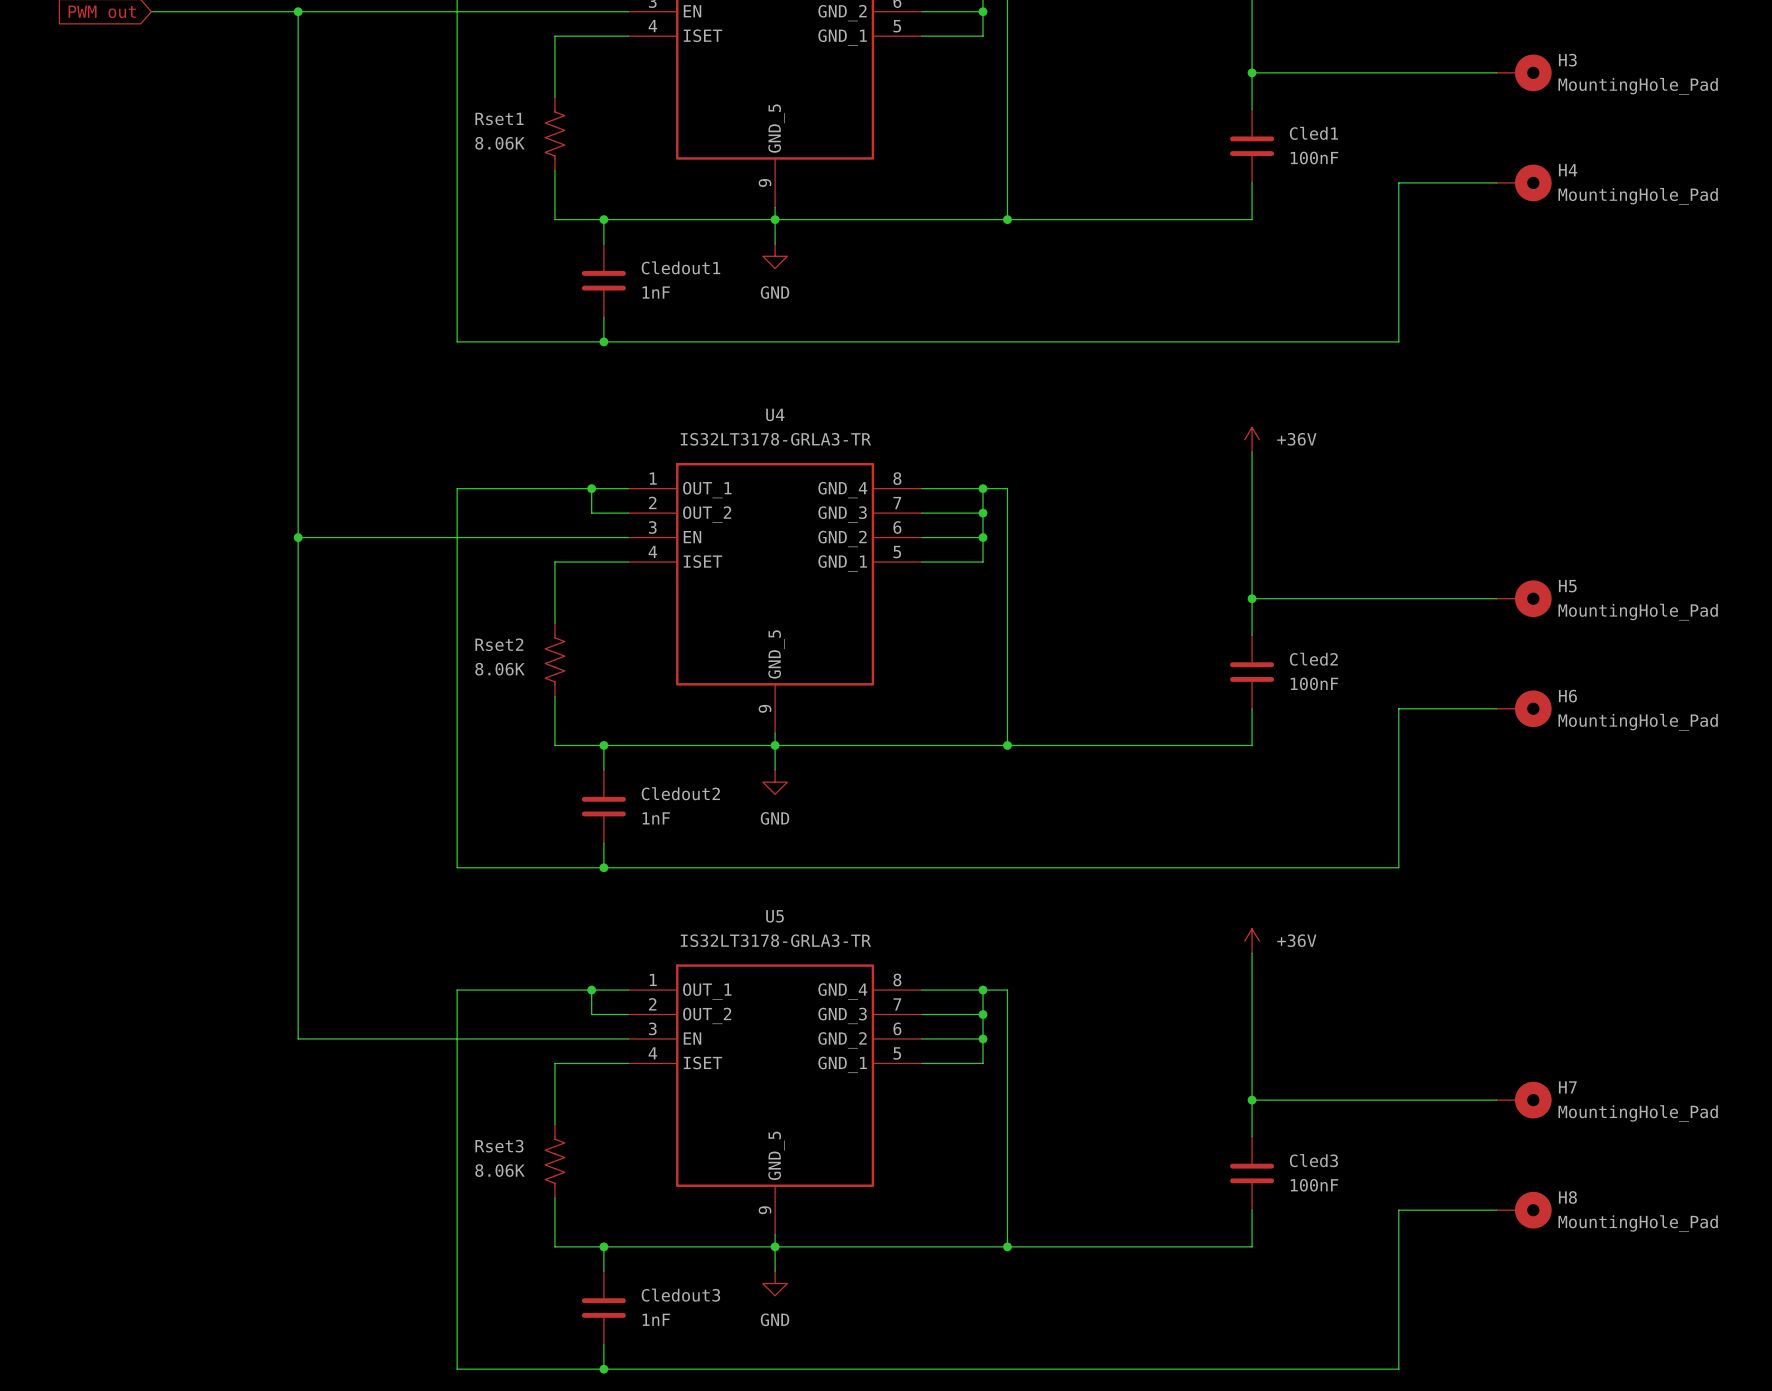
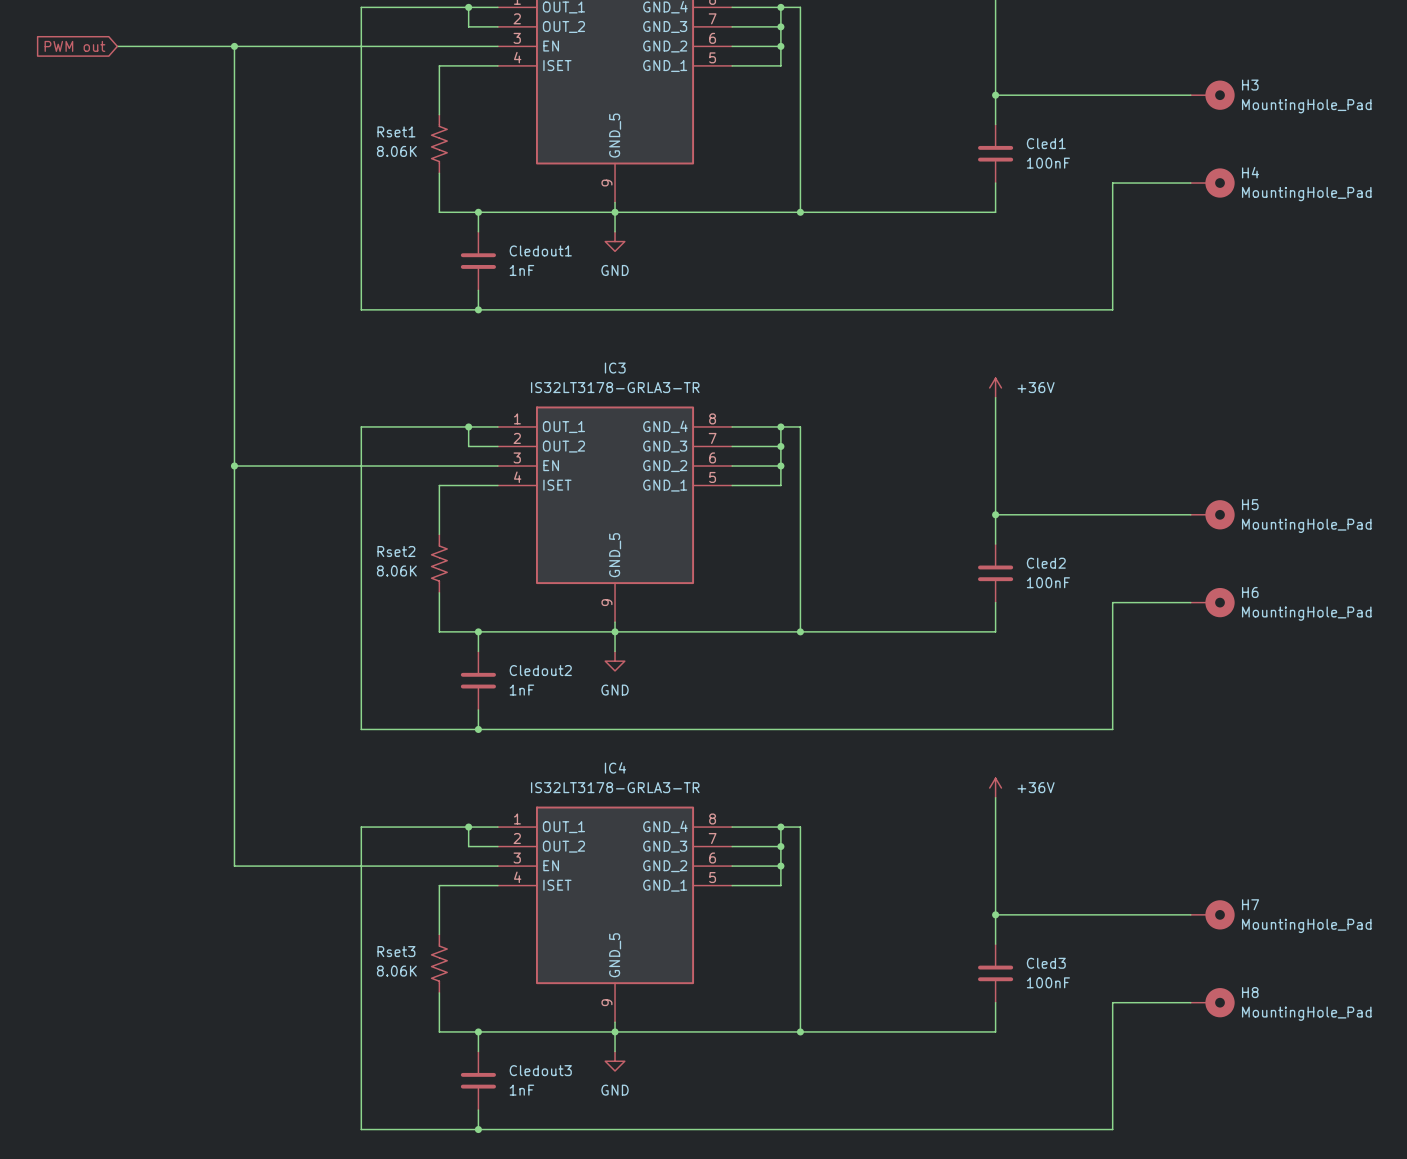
U4 name: U4 (775, 414) -> IC3 (615, 368)
U5 name: U5 (775, 916) -> IC4 (615, 767)

